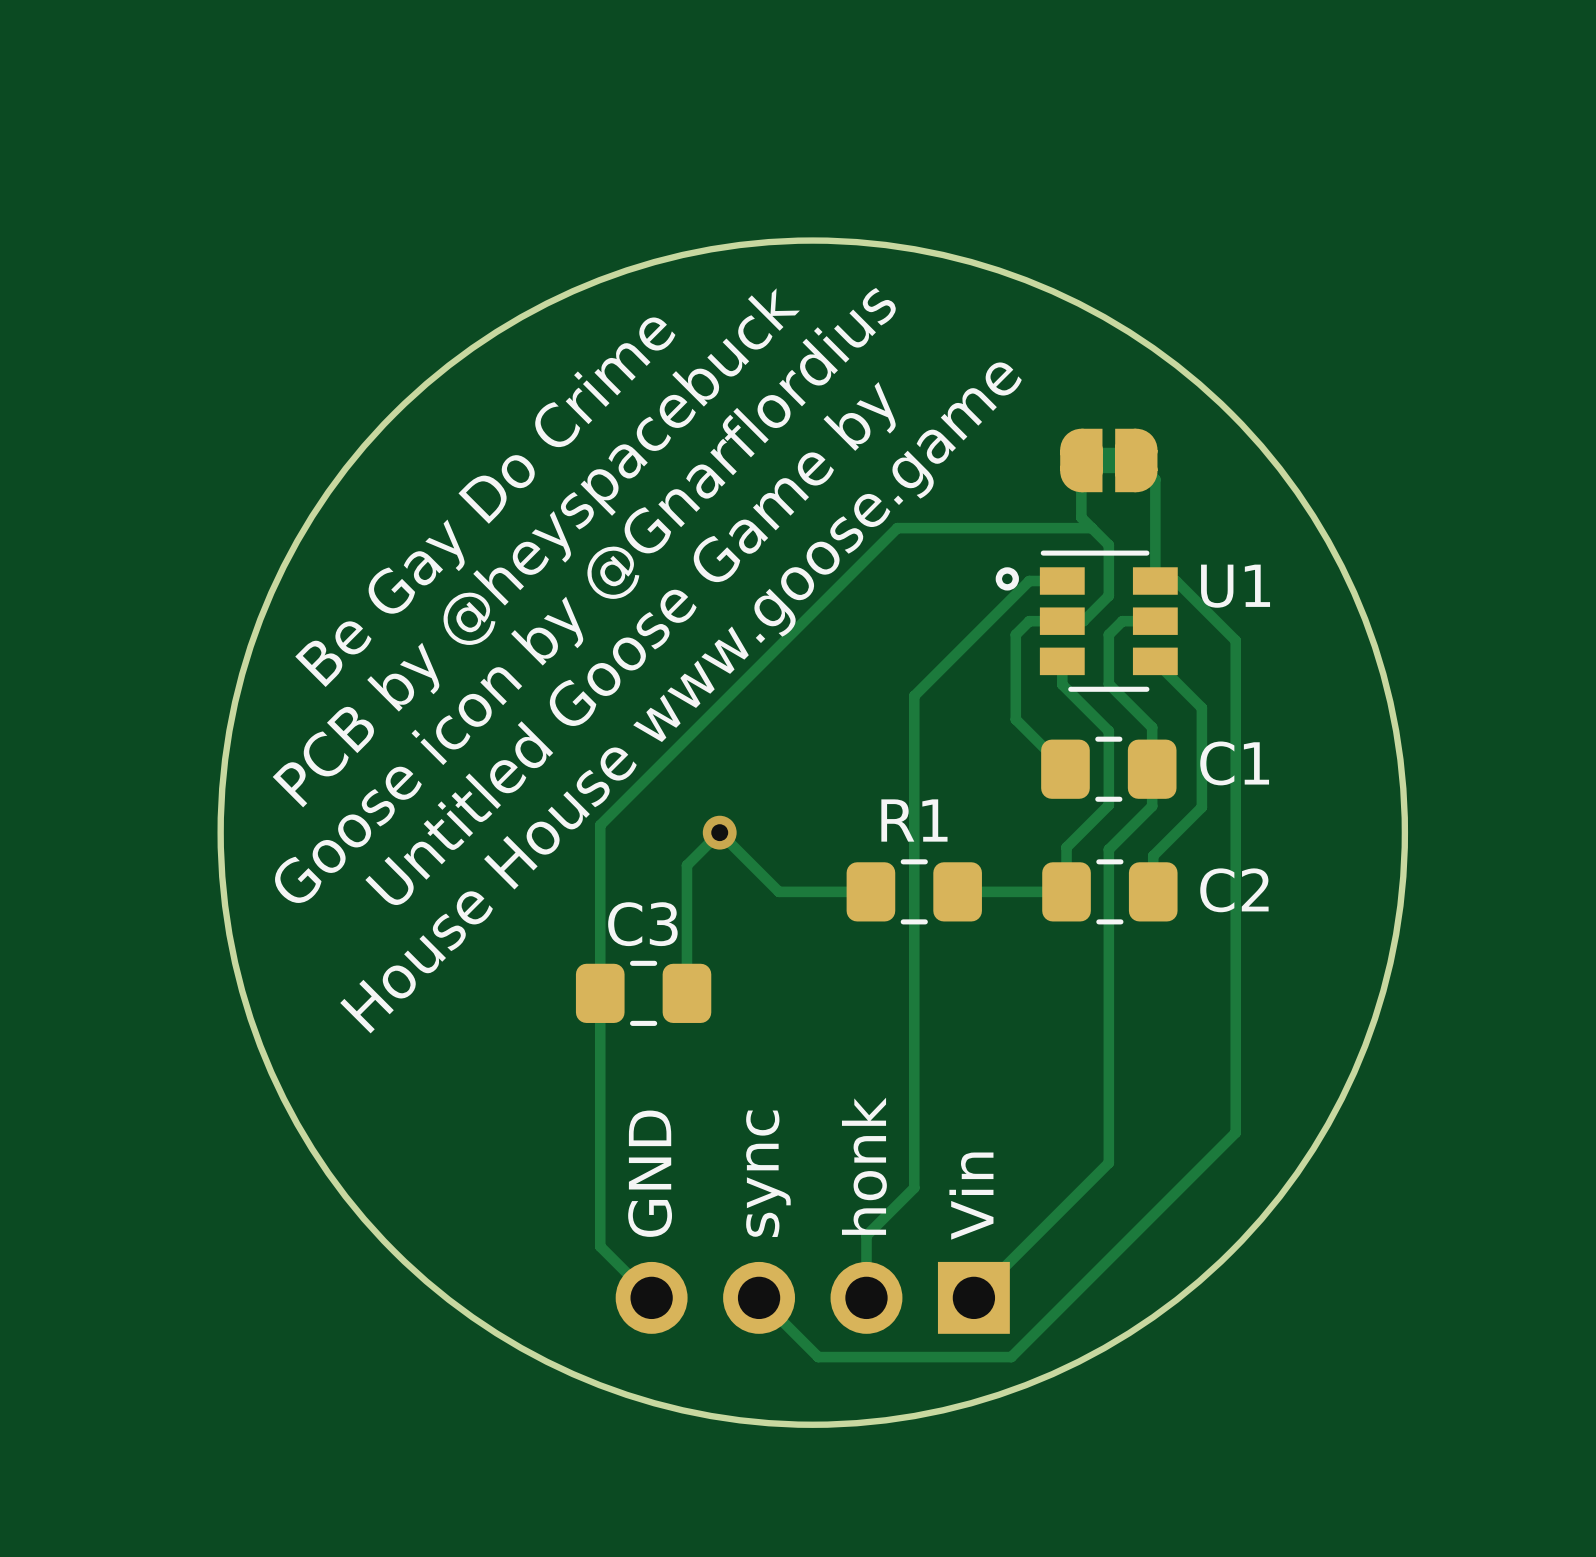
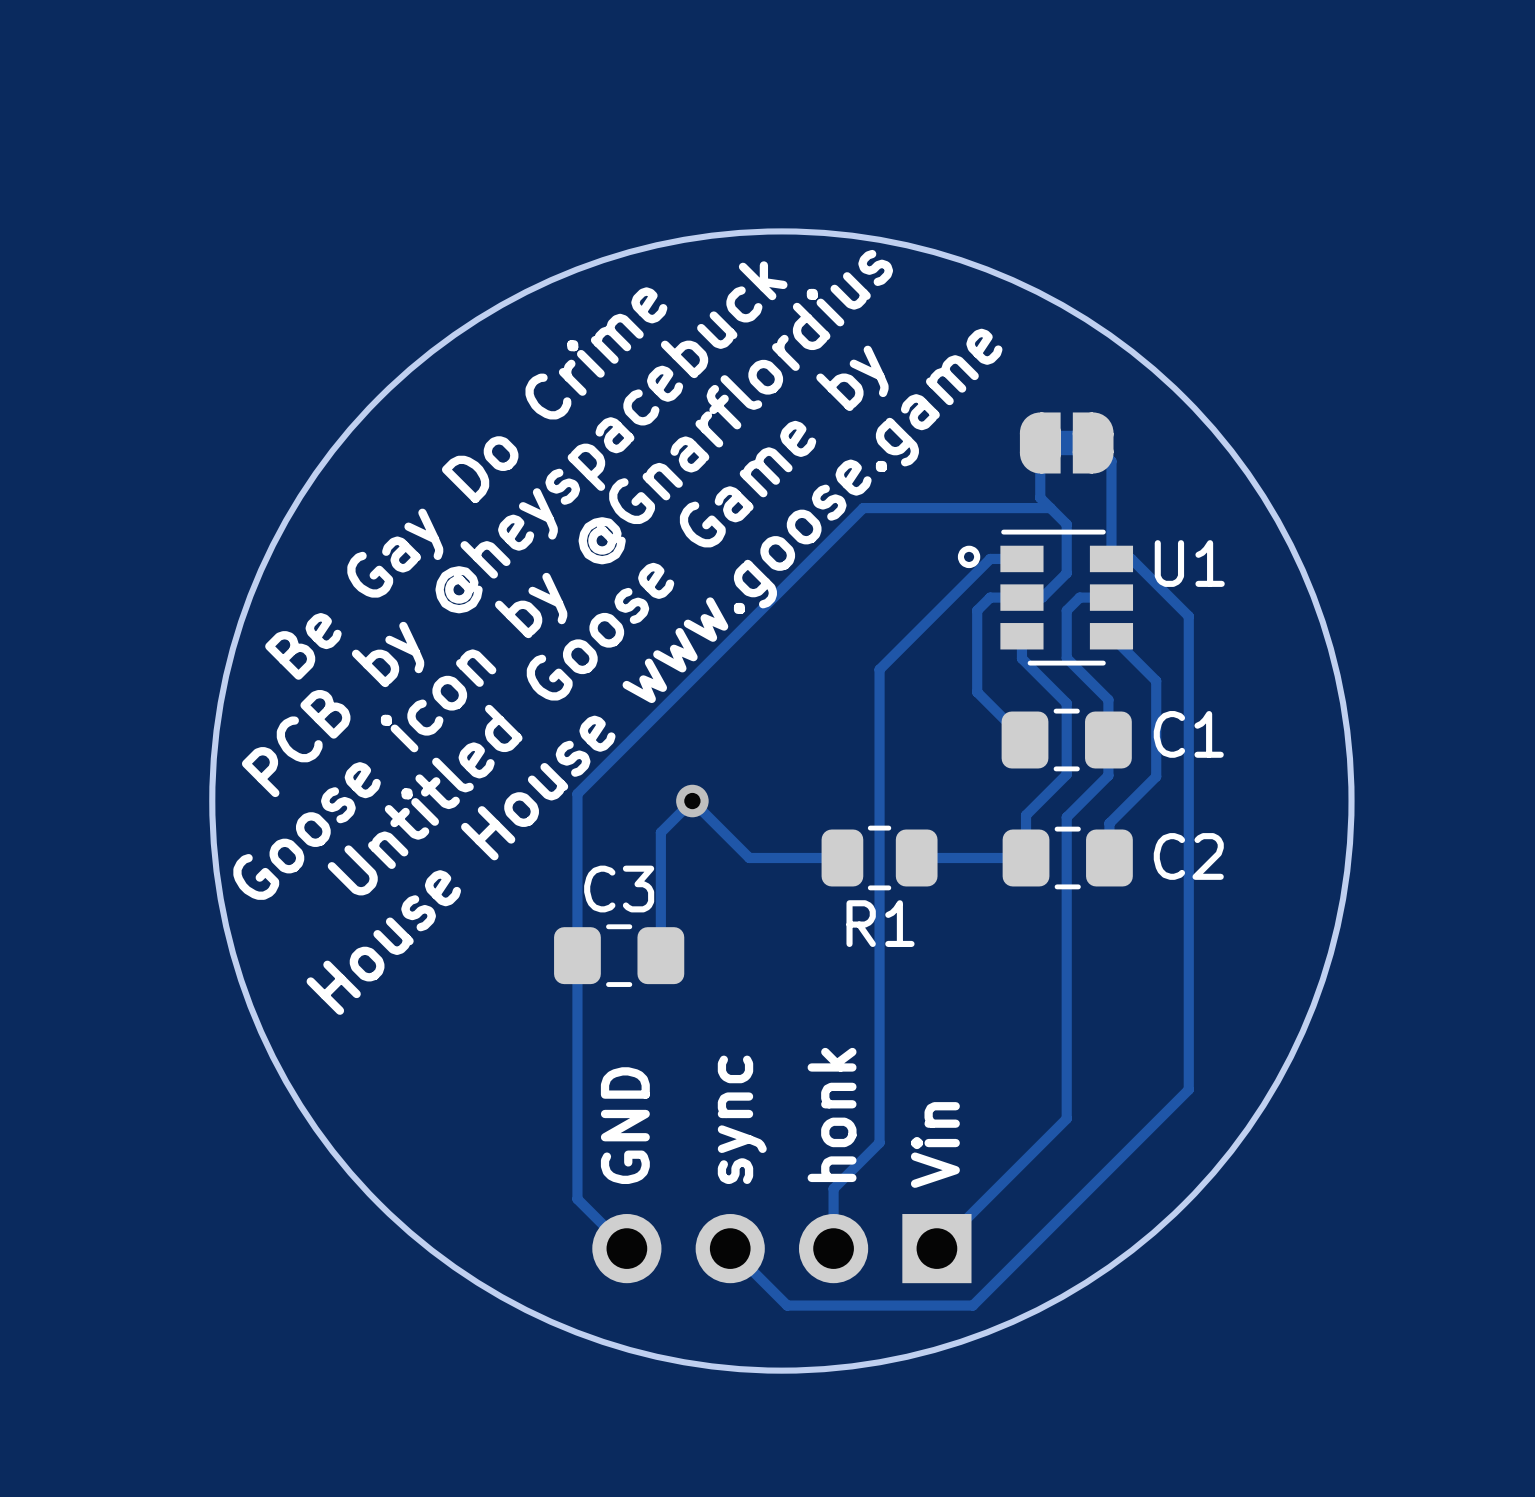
R1 name position: R1 (914, 820) -> R1 (880, 923)
R1 footprint: [846, 859, 982, 925] -> [821, 825, 938, 891]

